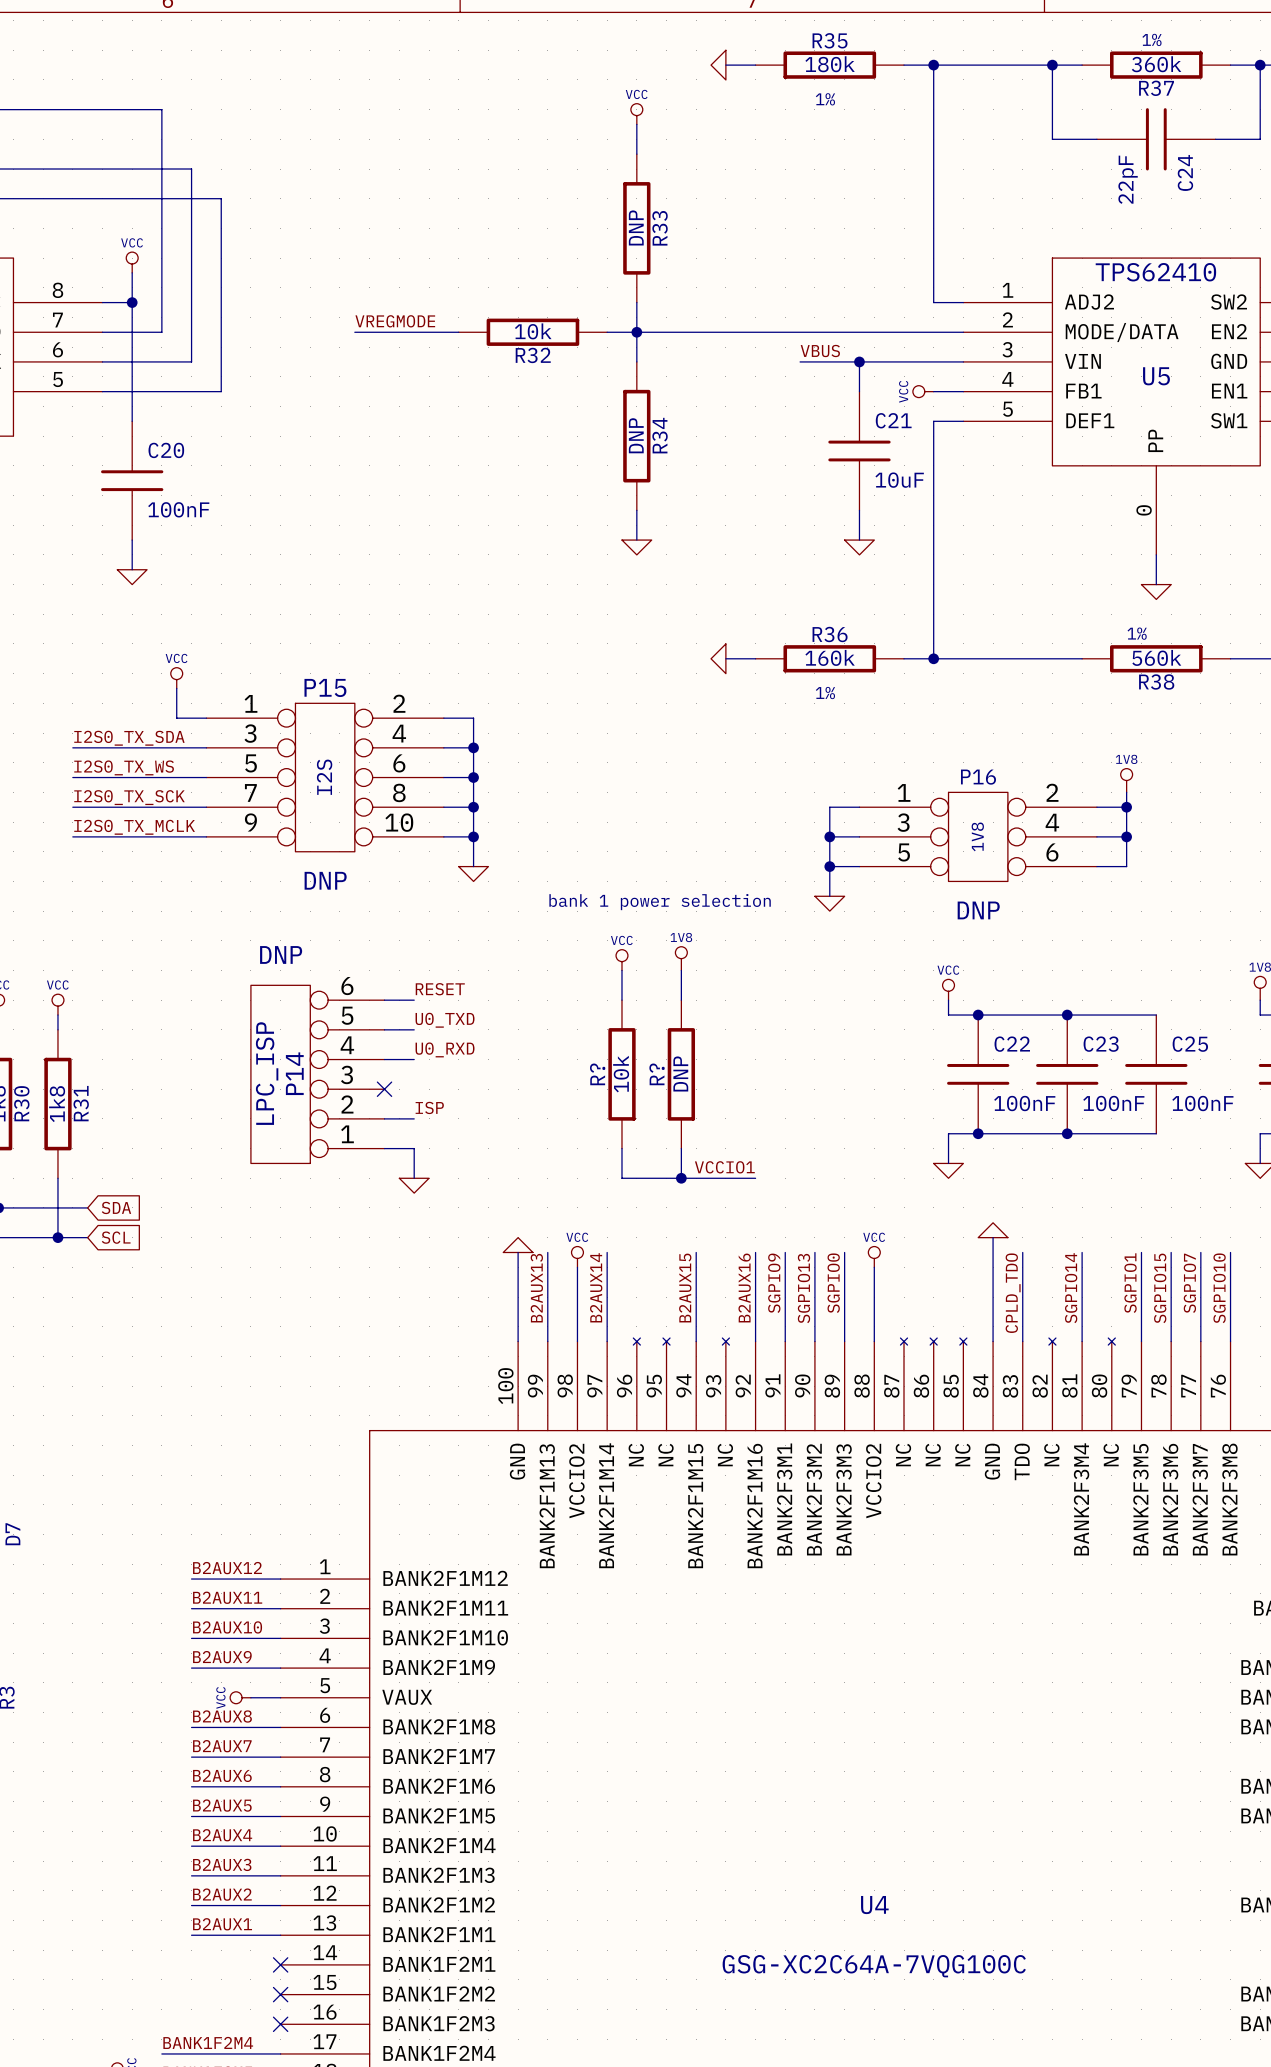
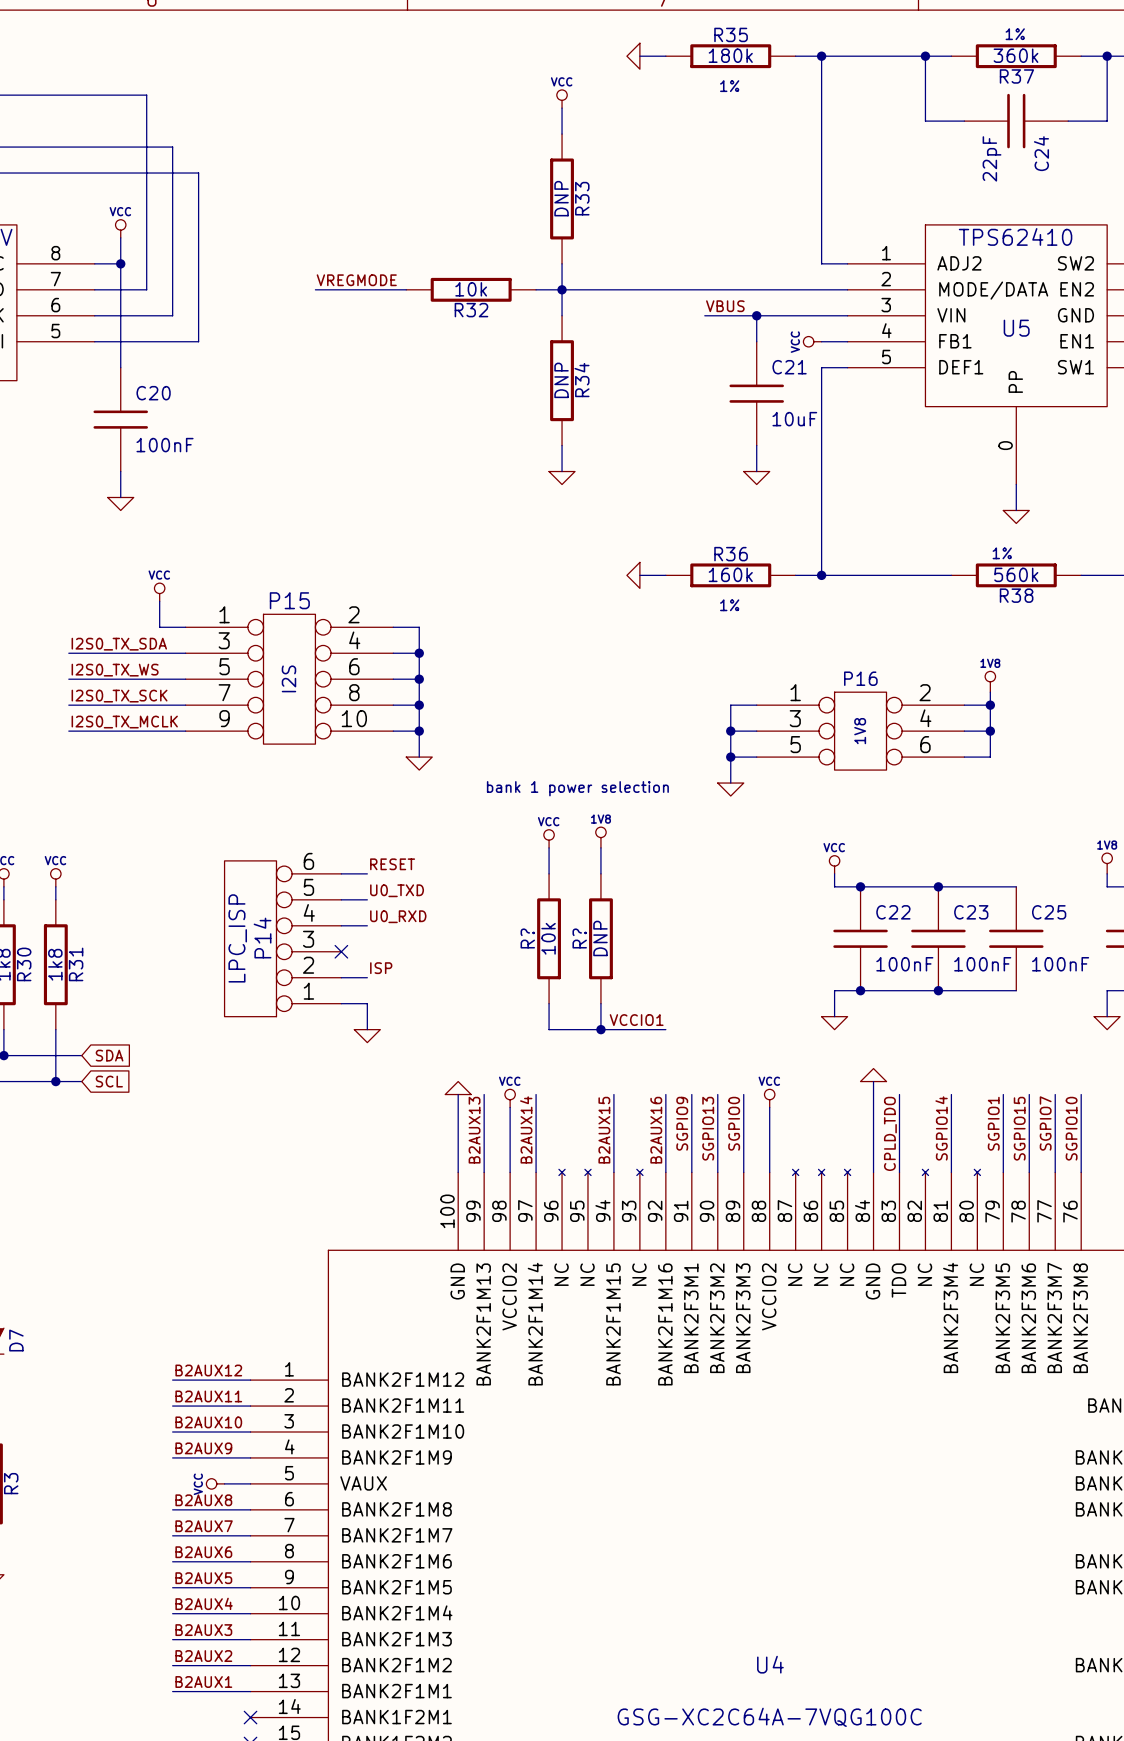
P15 text: DNP (325, 880) -> none
P16 text: DNP (978, 910) -> none
P14 text: DNP (281, 954) -> none

